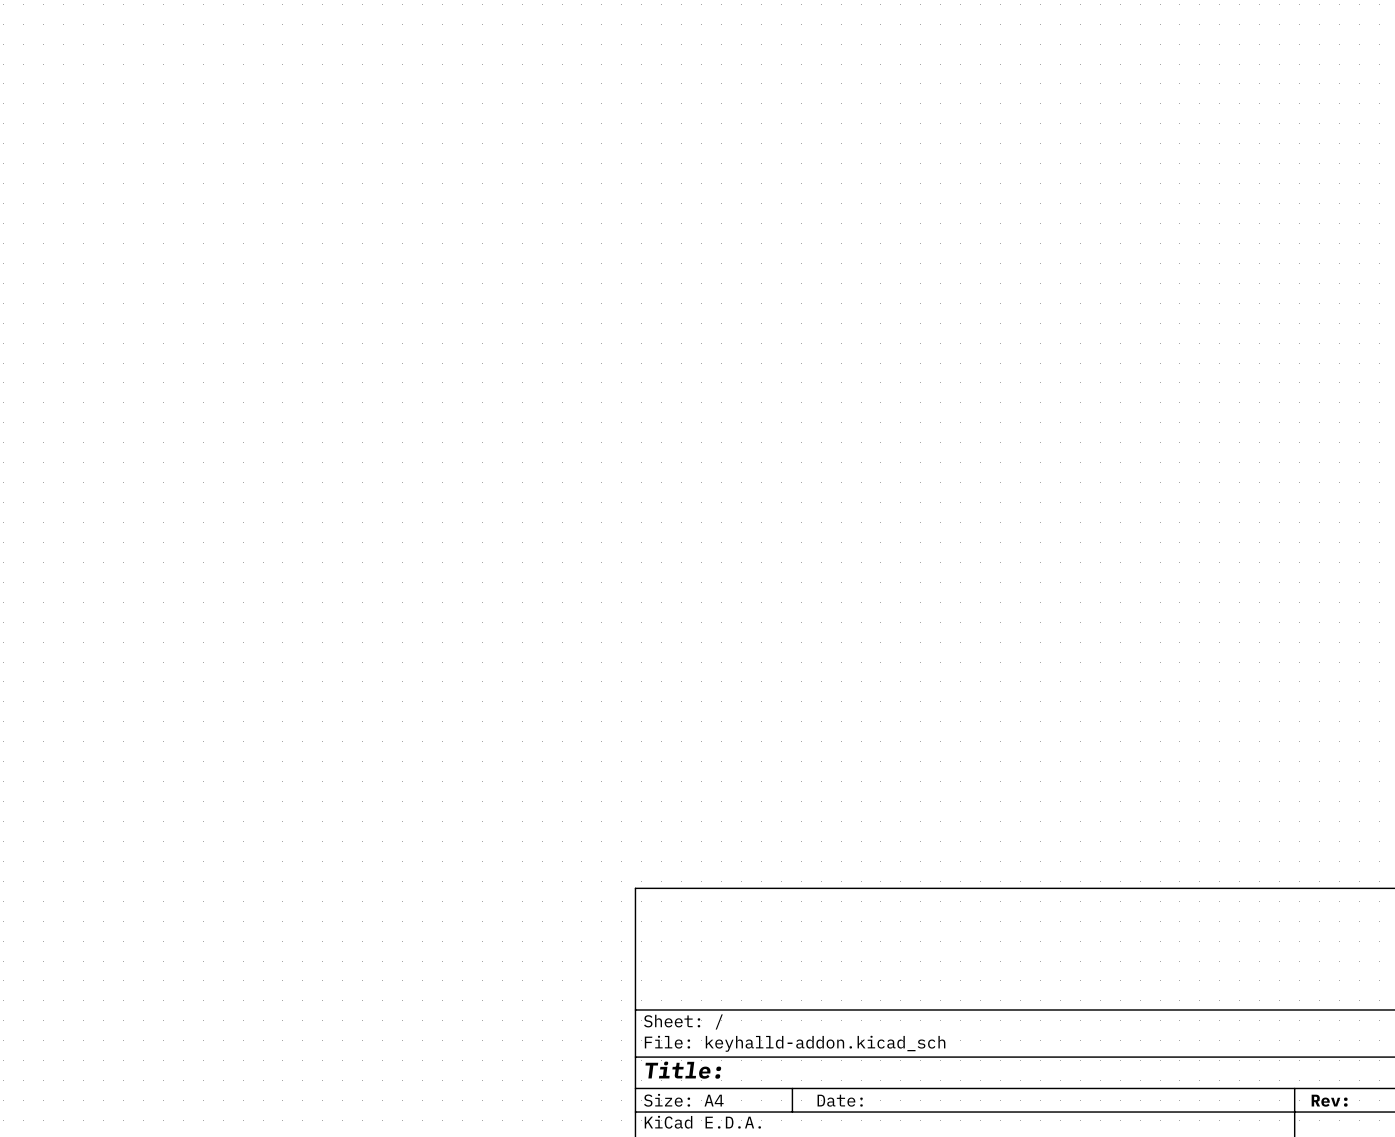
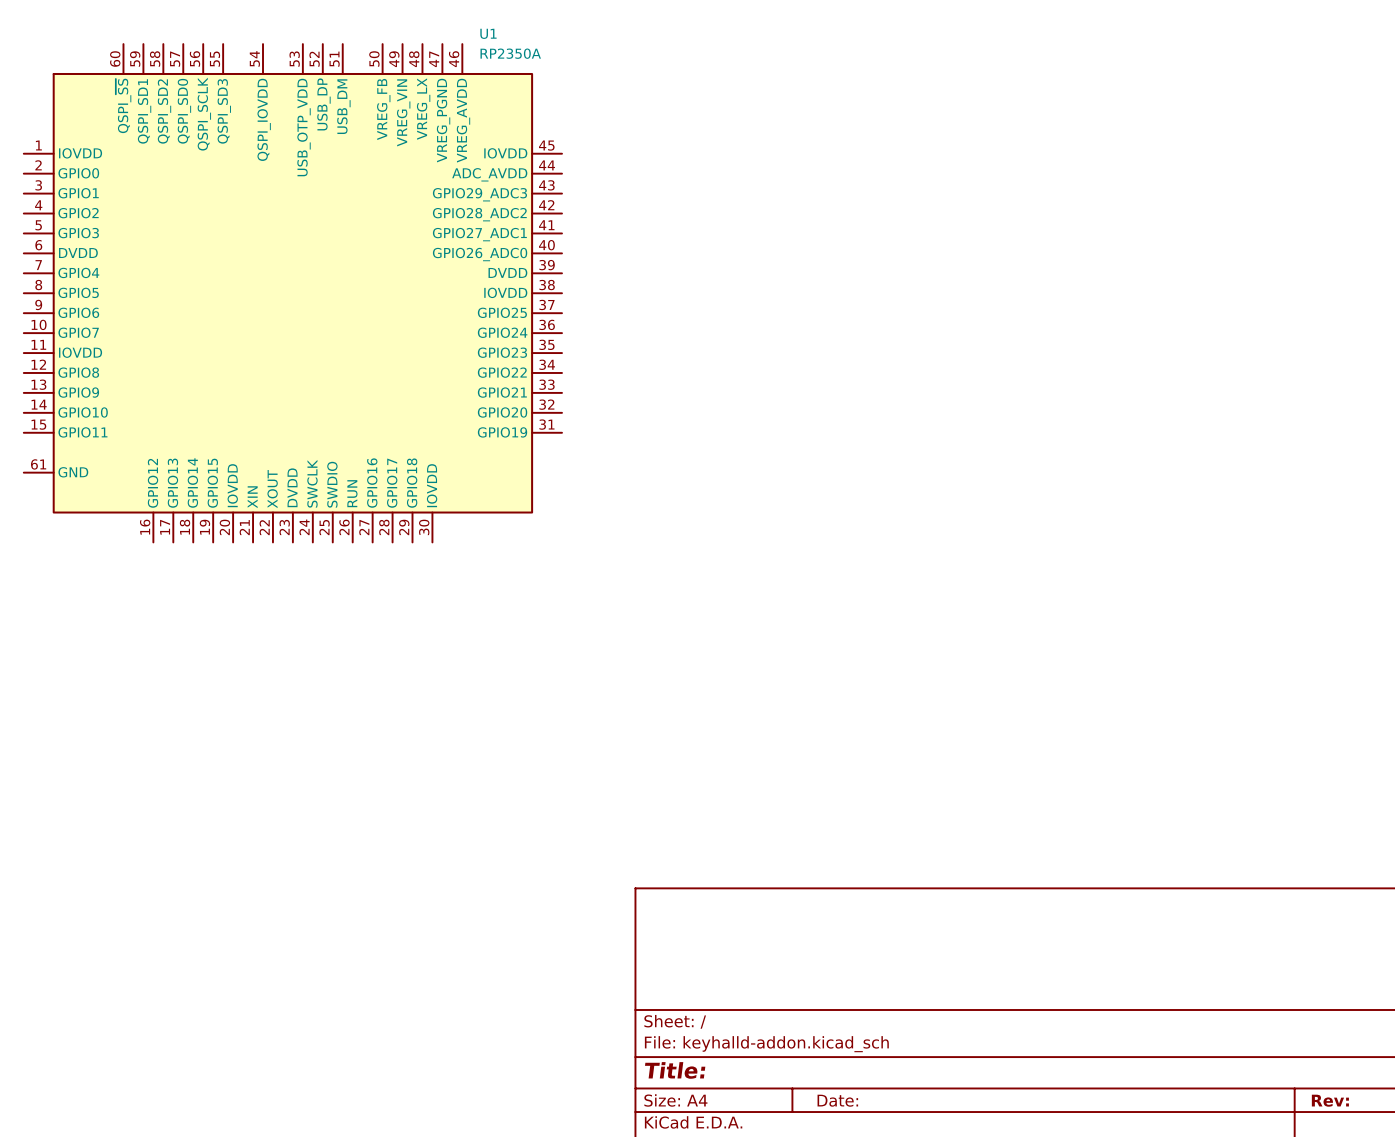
U1: none -> RP2350A (292, 293)

